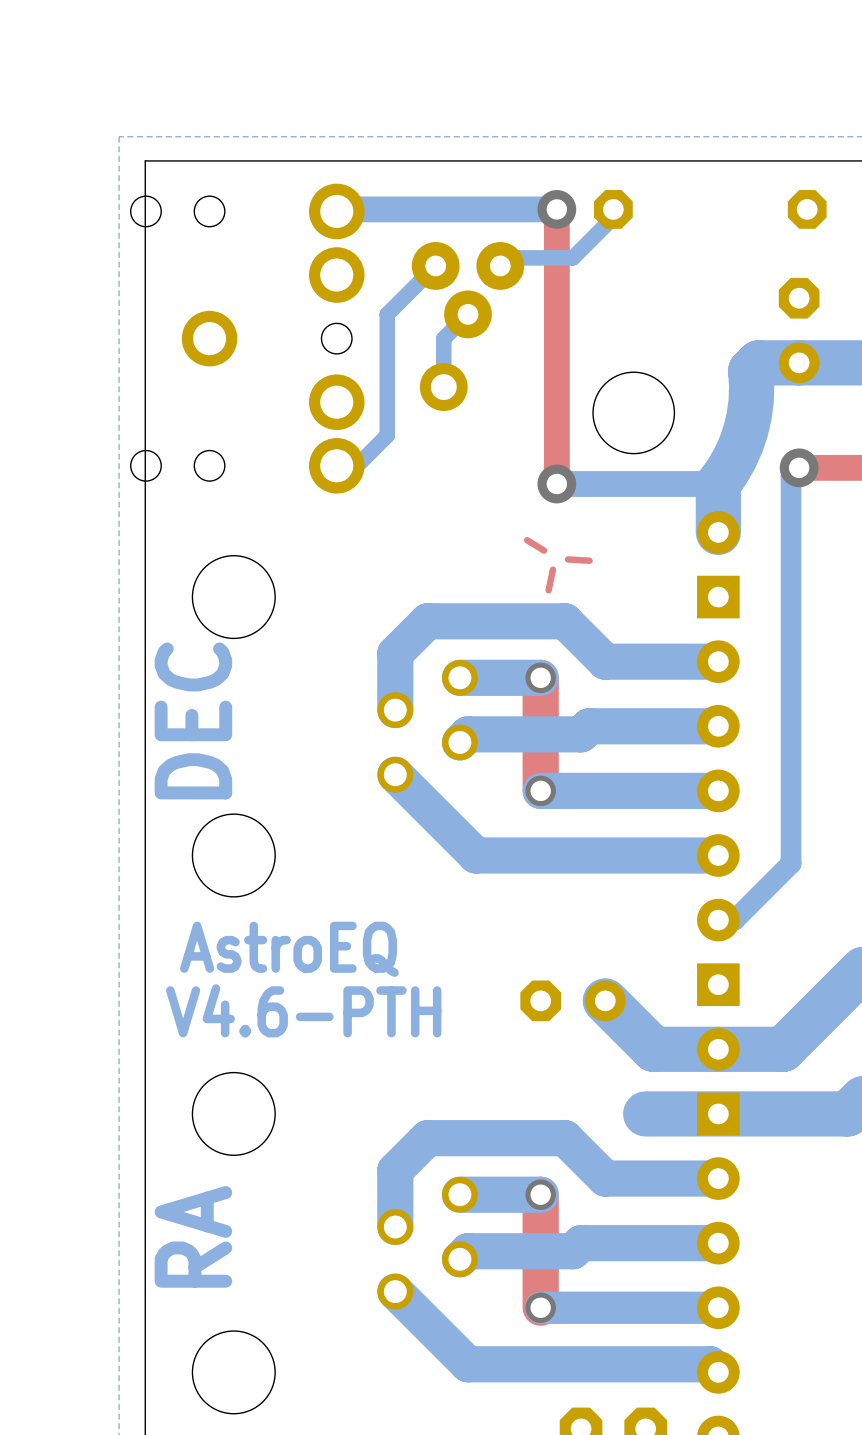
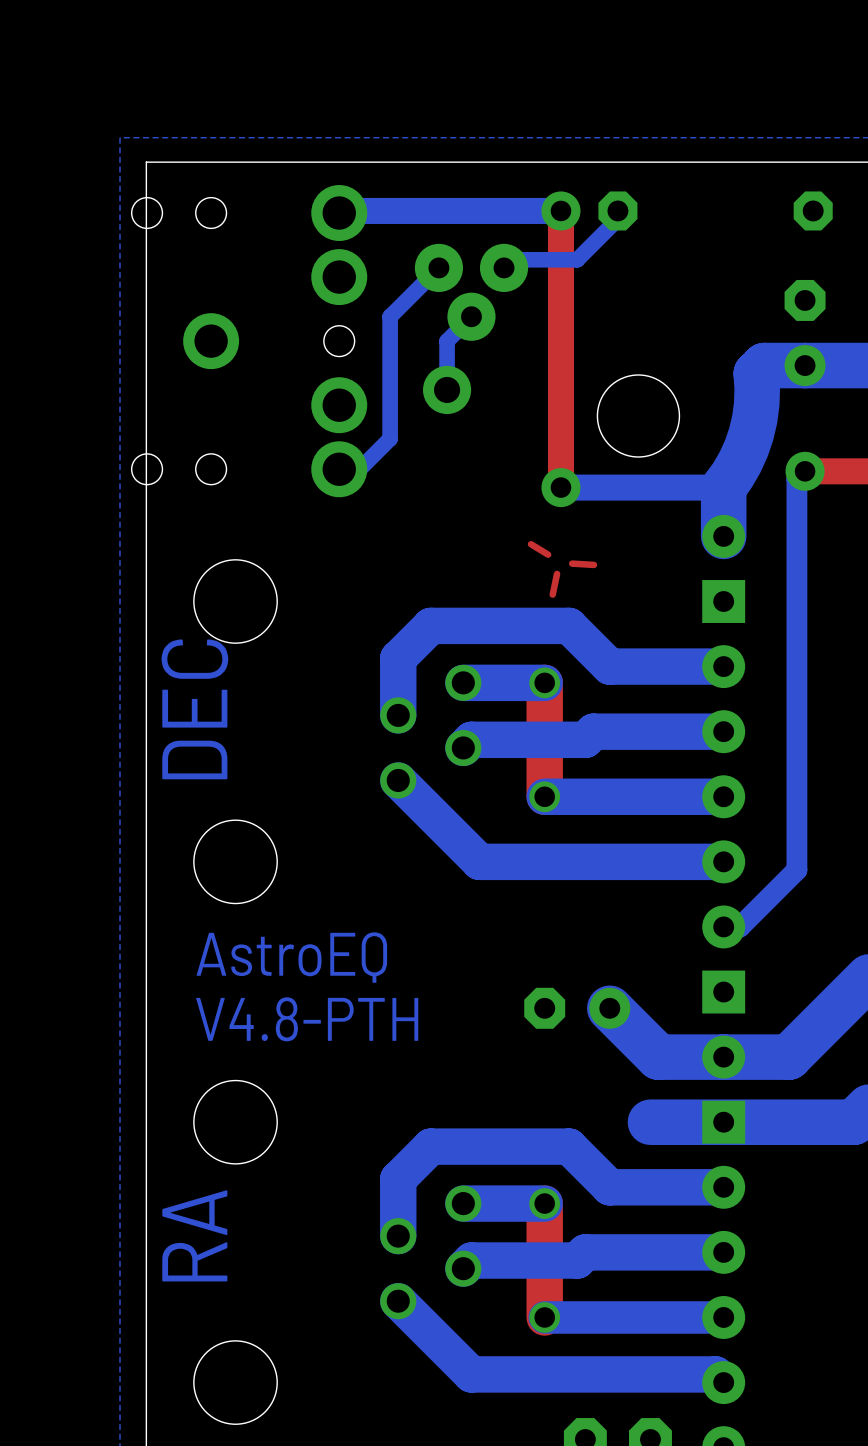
text: V4.6-PTH (303, 1010) -> V4.8-PTH (307, 1019)

